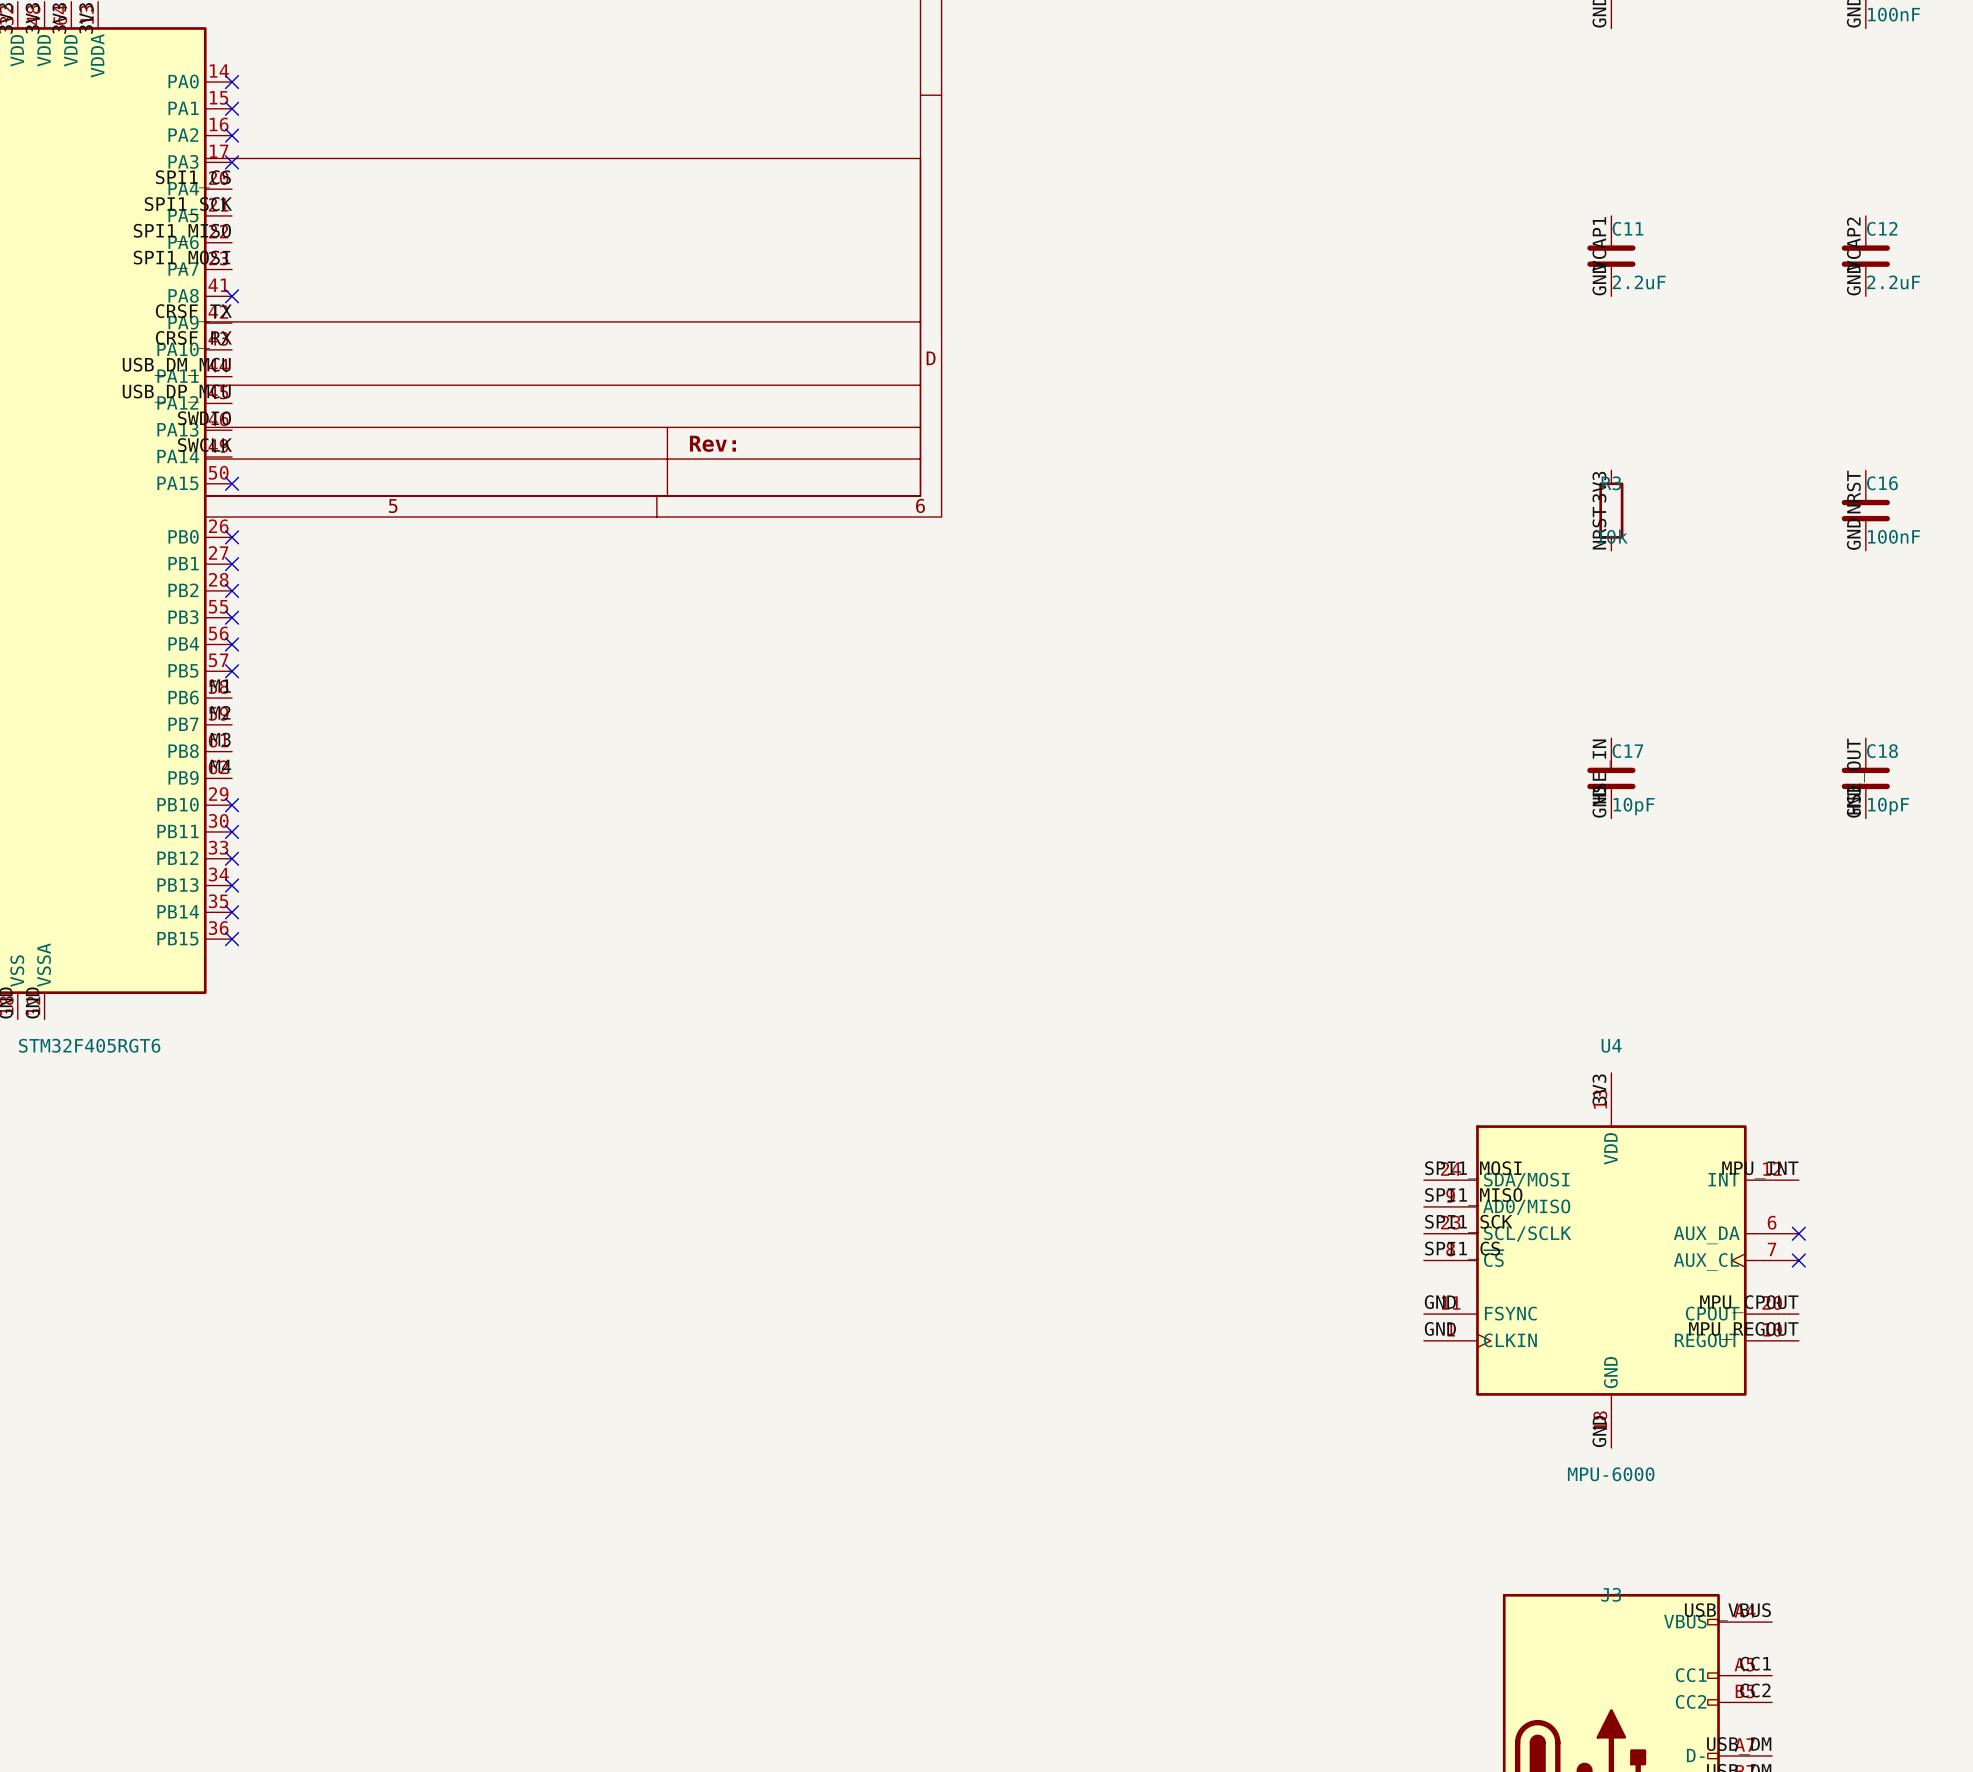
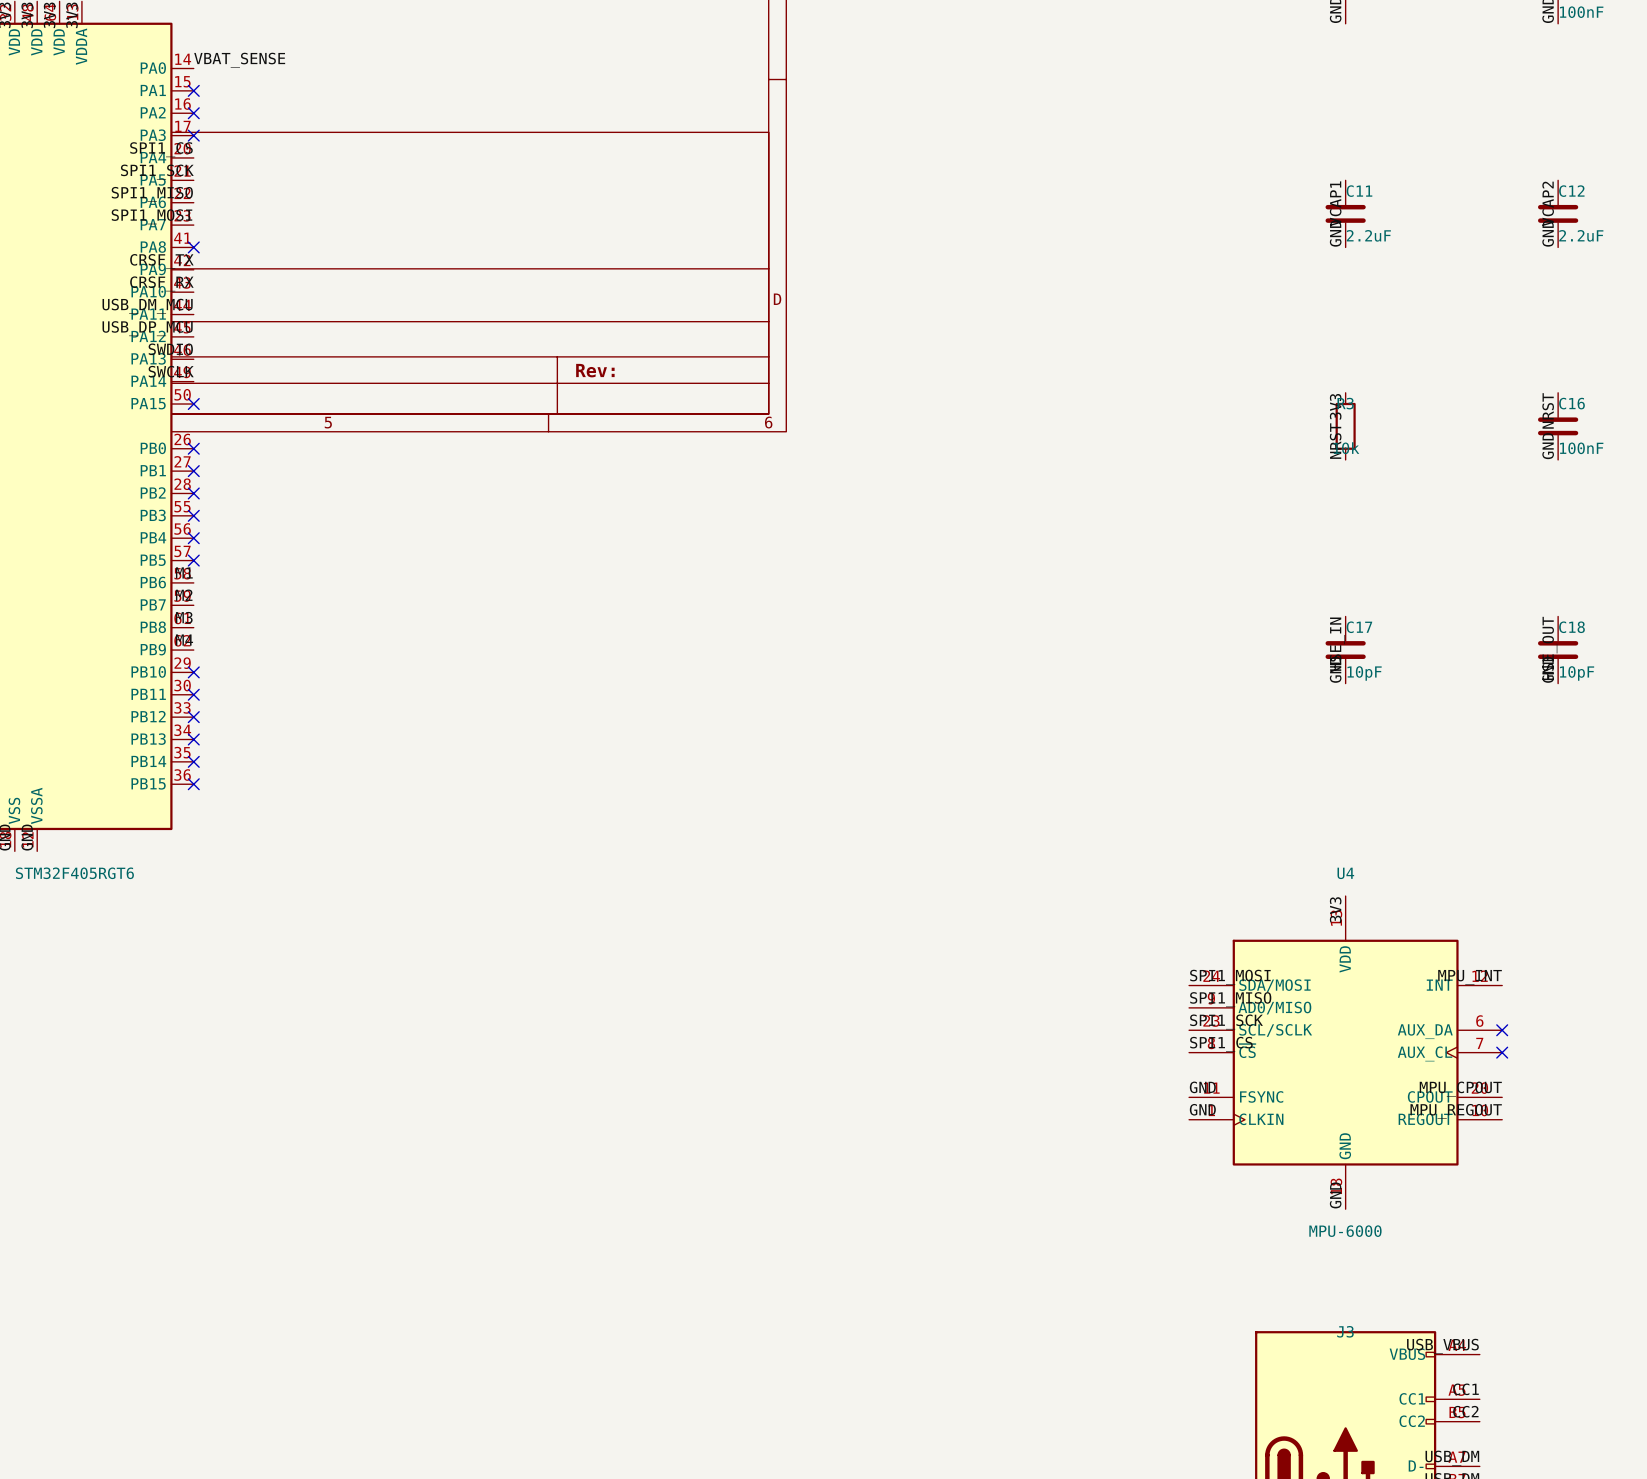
label: none -> VBAT_SENSE (239, 60)
no-connect mark: (232, 82) -> none

